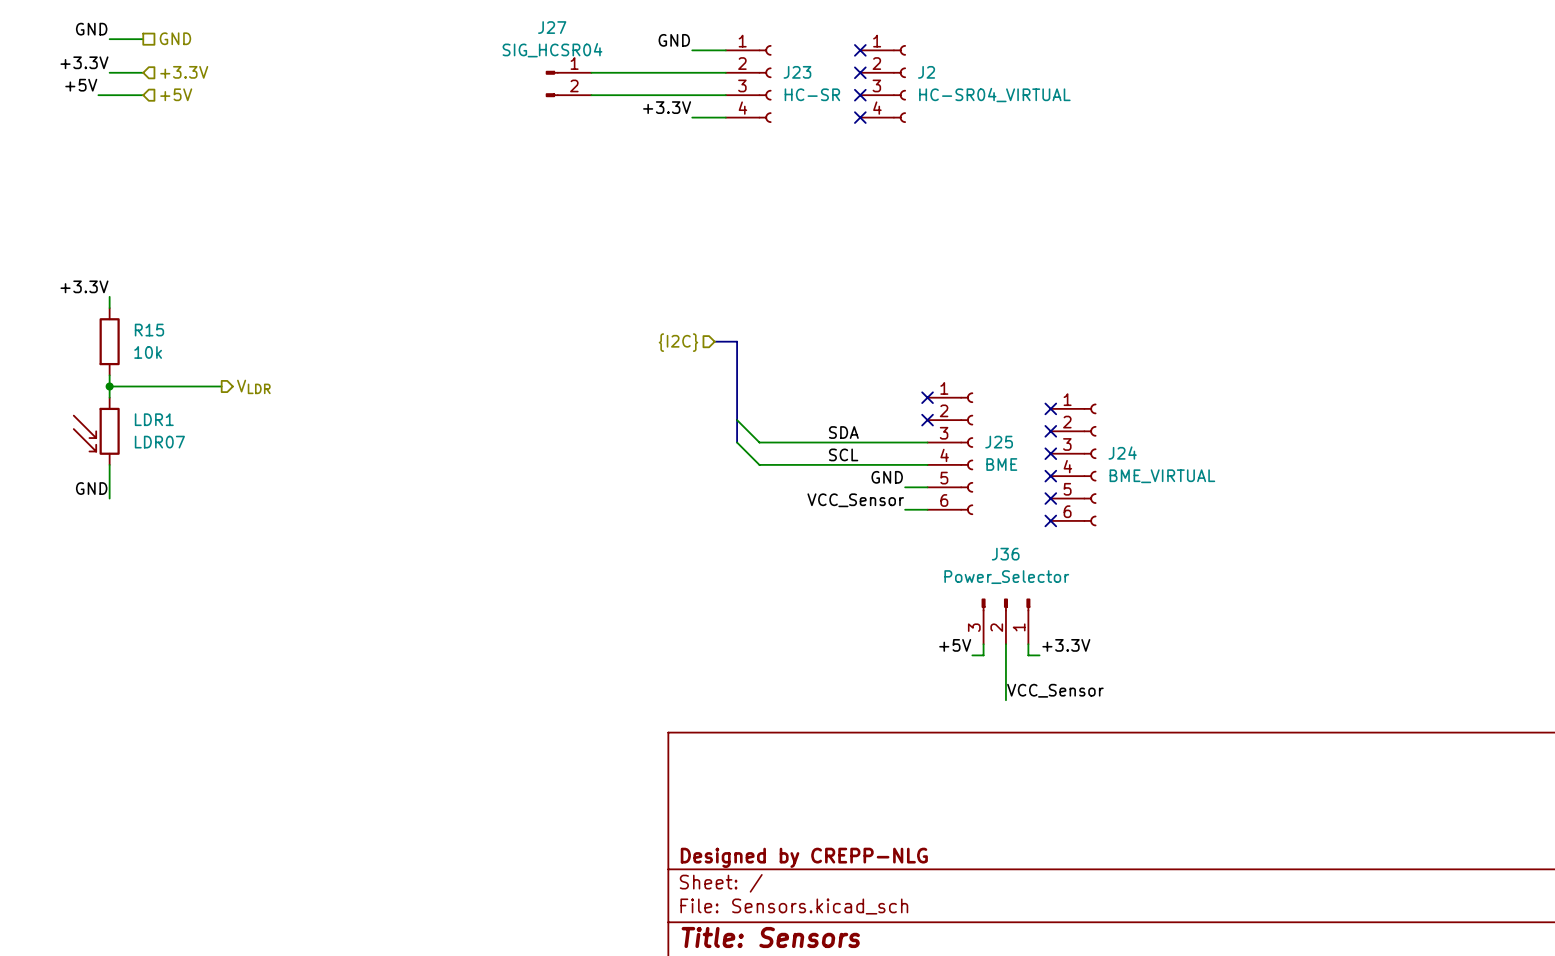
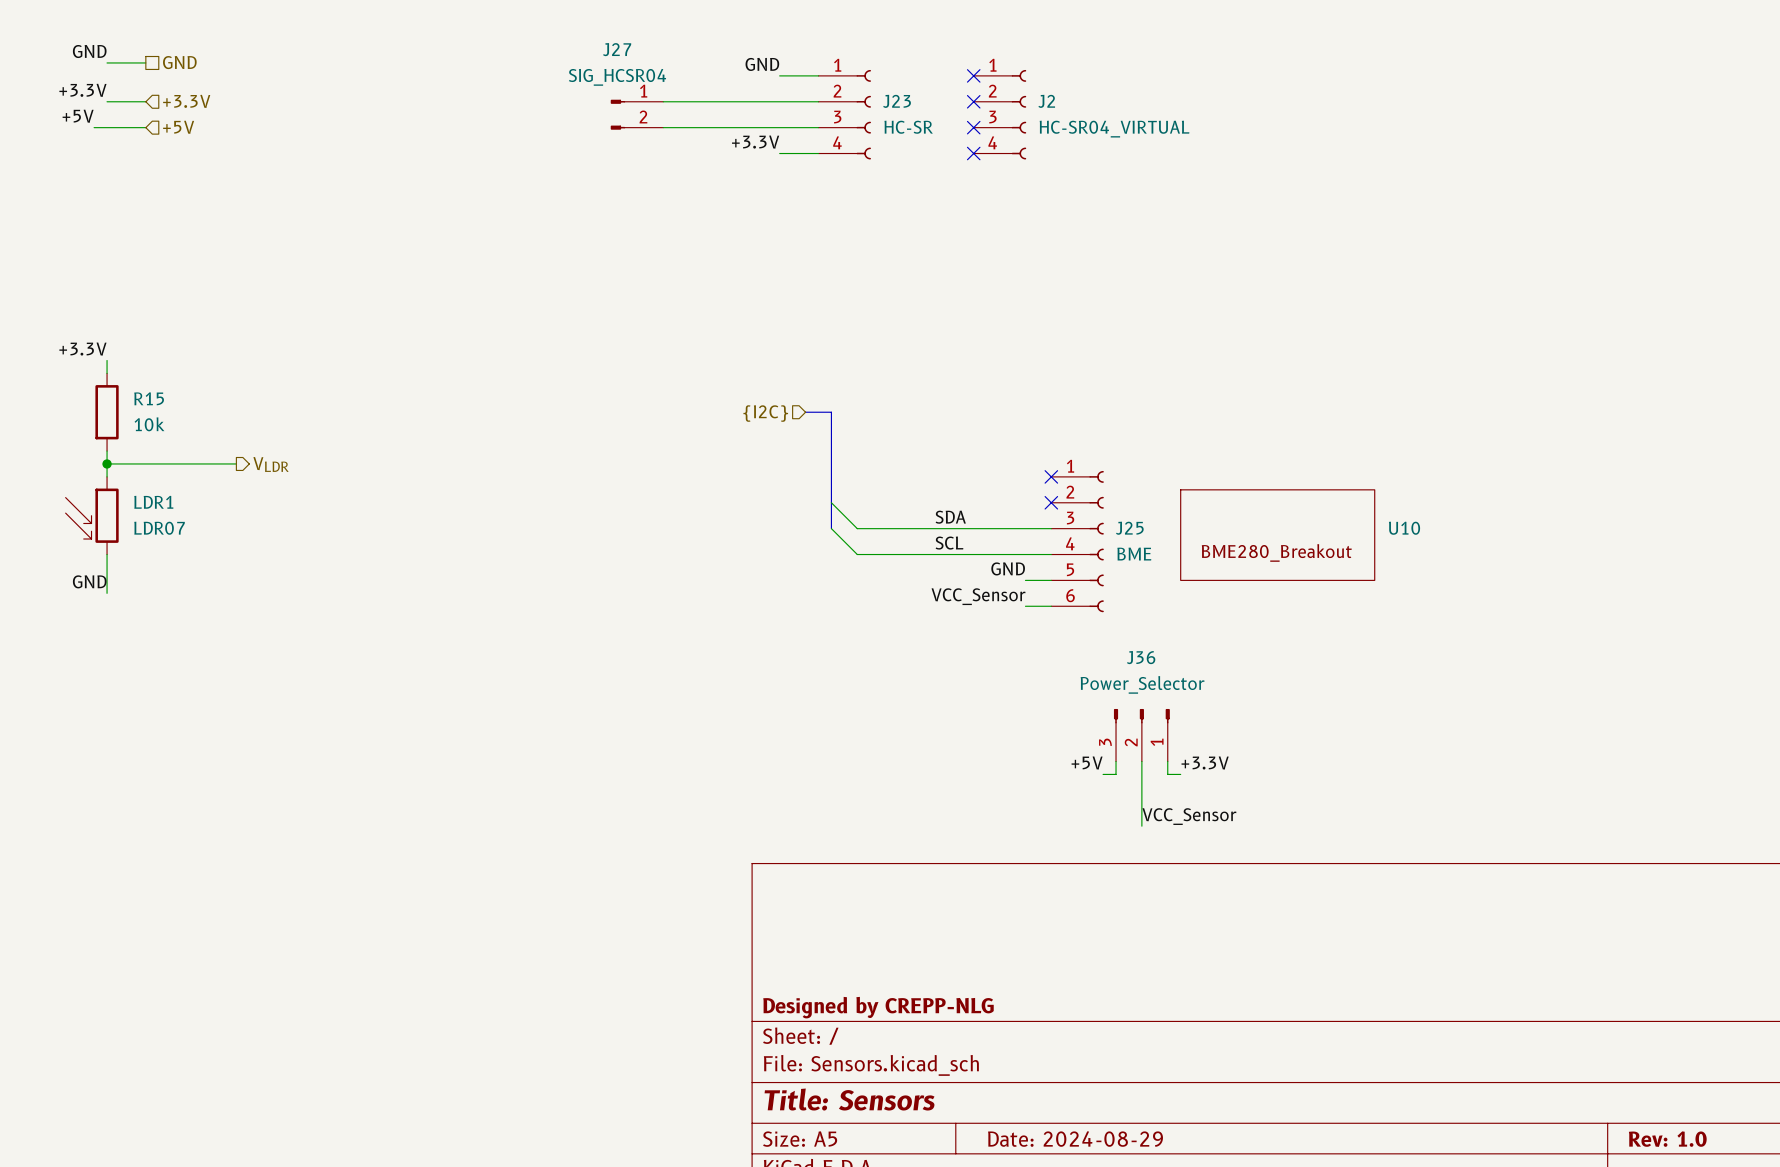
no-connect mark: (1050, 408) -> none
no-connect mark: (1050, 431) -> none
U10: none -> (1277, 535)
no-connect mark: (1050, 453) -> none
J24: BME_VIRTUAL (1073, 464) -> none
no-connect mark: (1050, 476) -> none
no-connect mark: (1050, 498) -> none
no-connect mark: (1050, 520) -> none

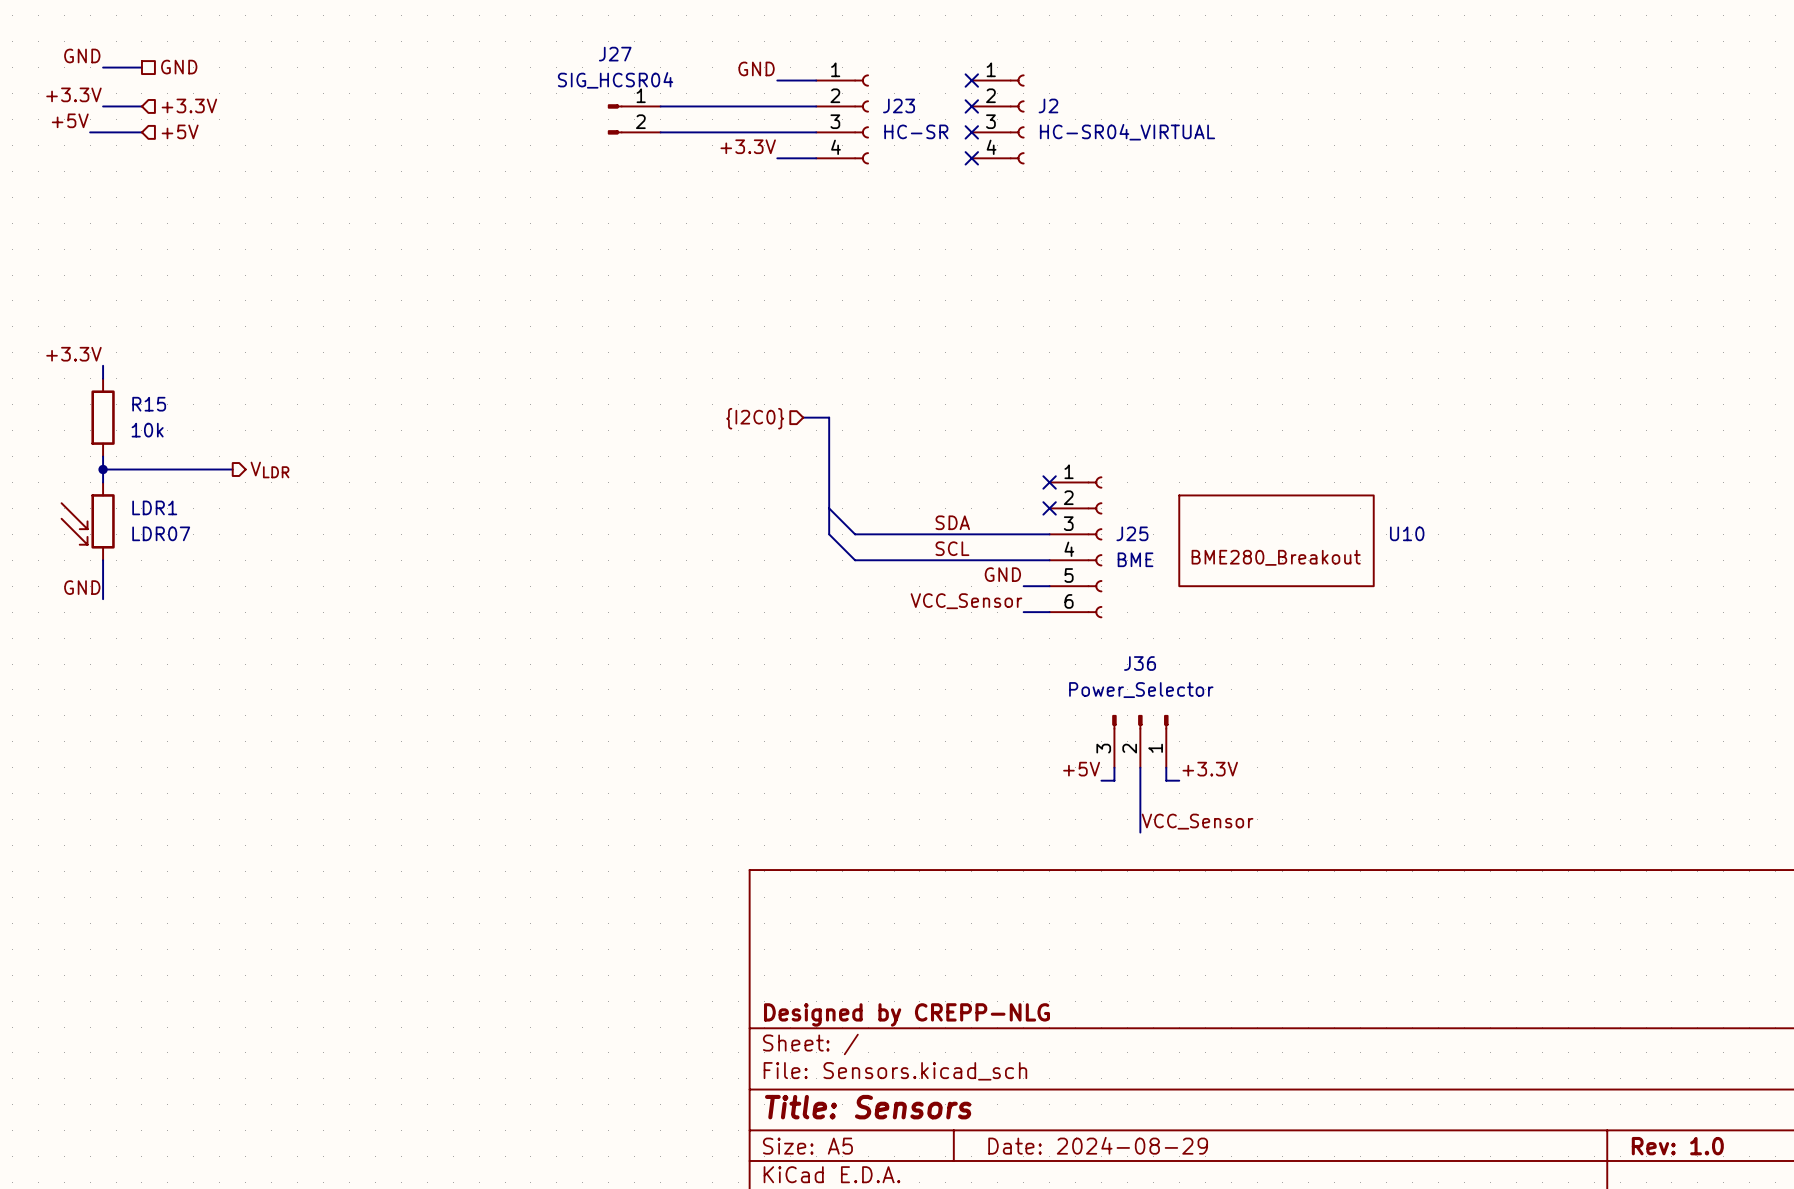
hierarchical label: {I2C} (765, 413) -> {I2C0} (755, 418)

